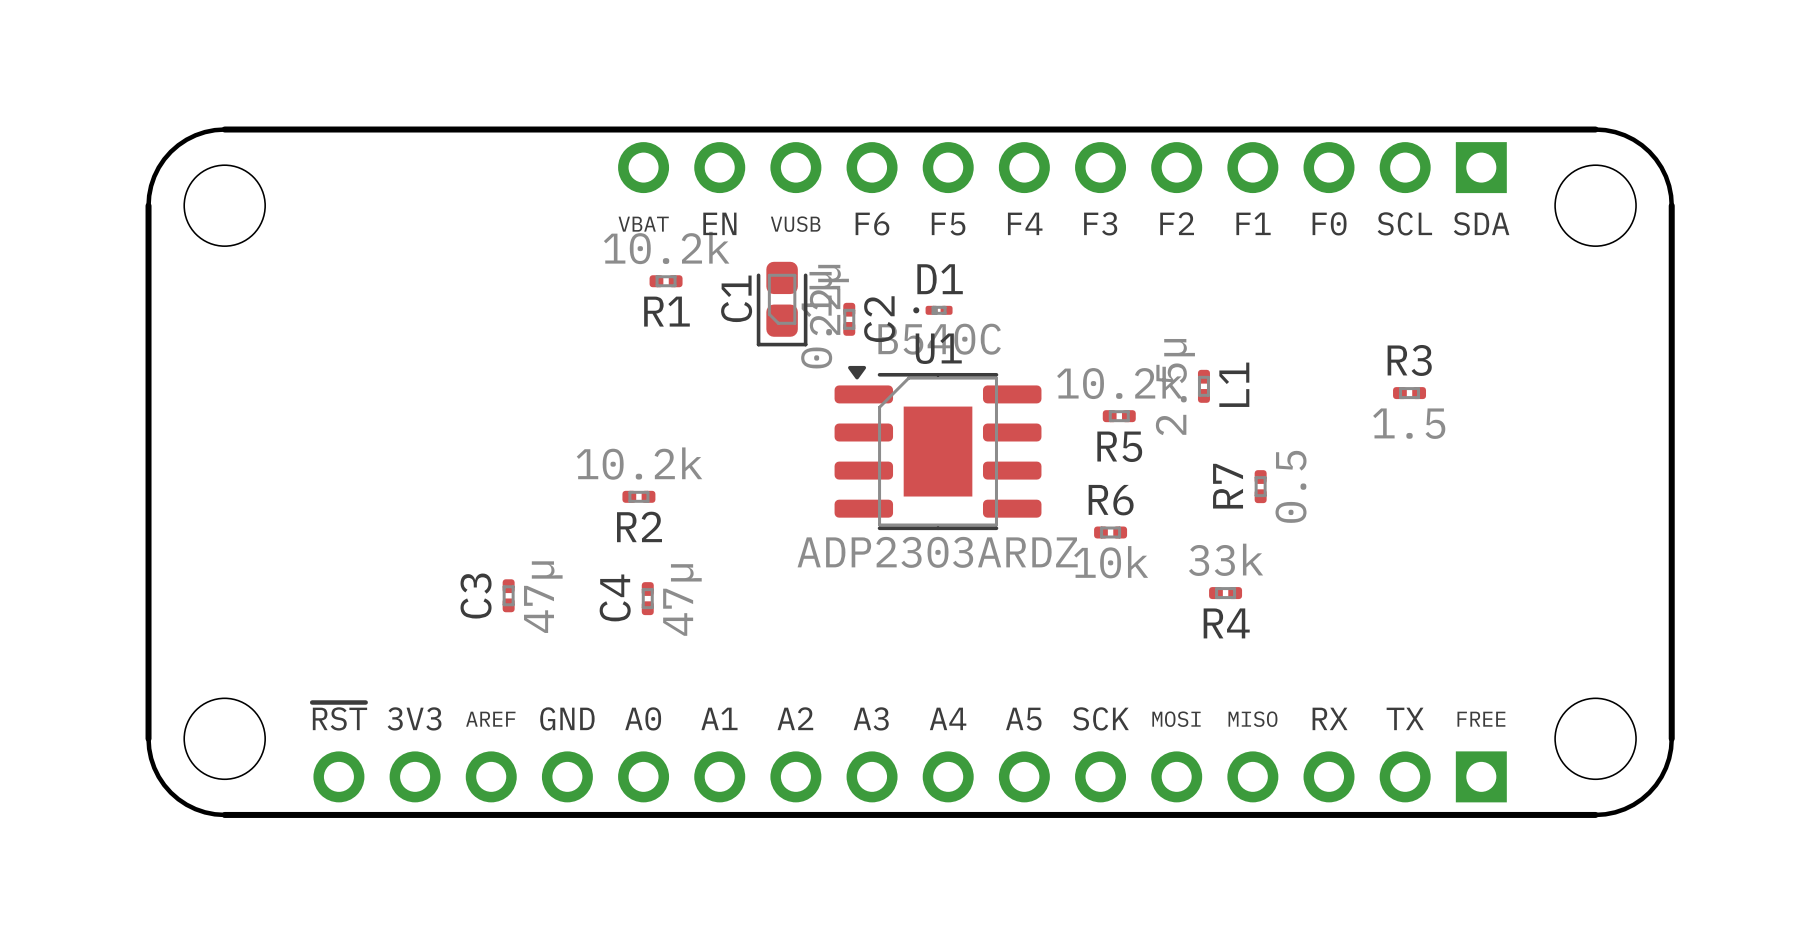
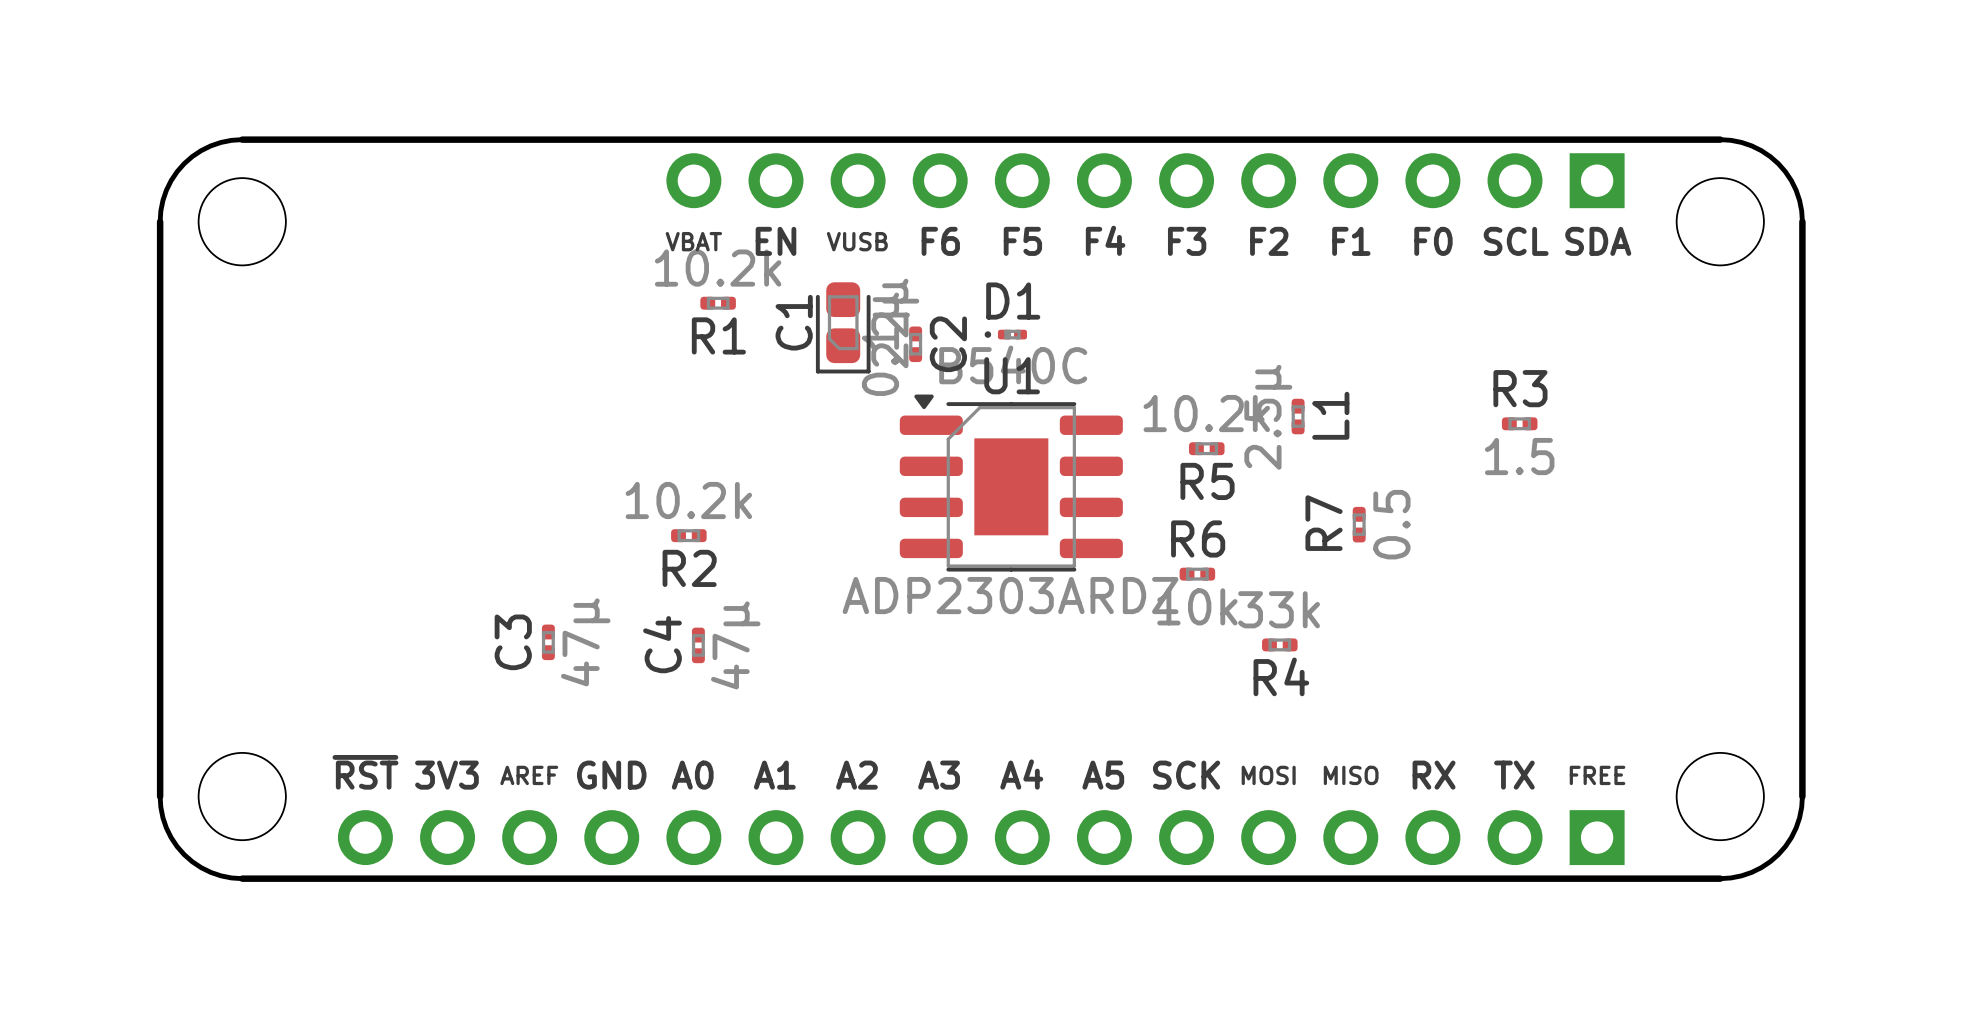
R4 position: (1225, 593) -> (1279, 644)

